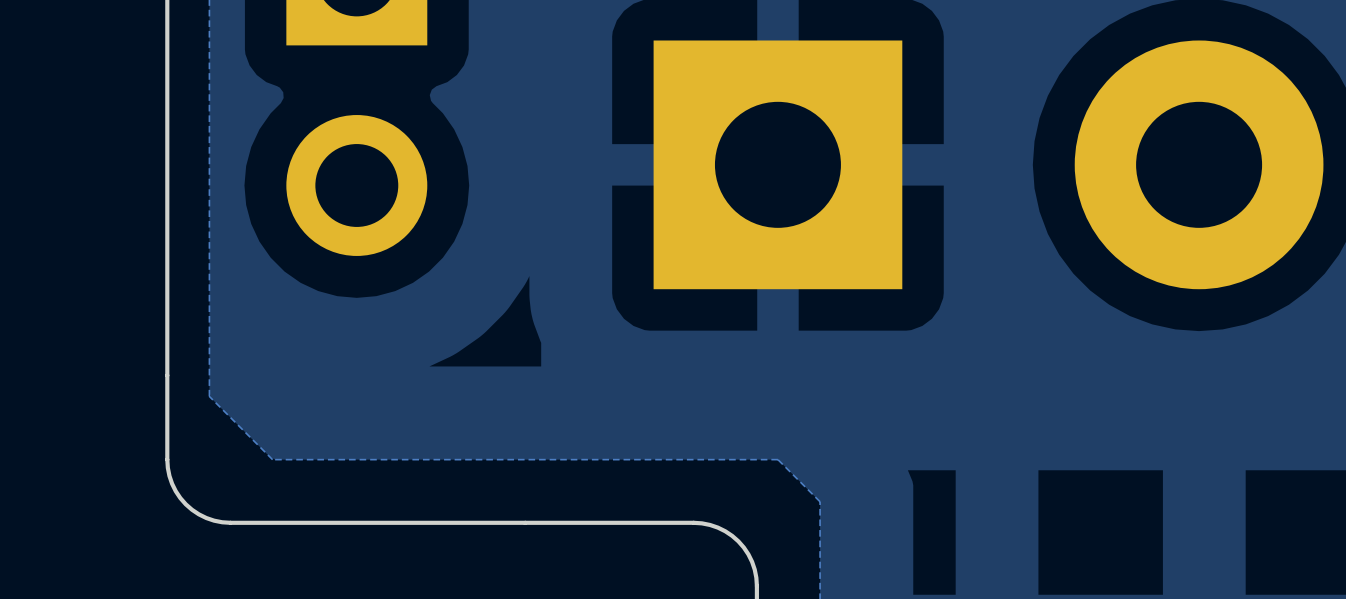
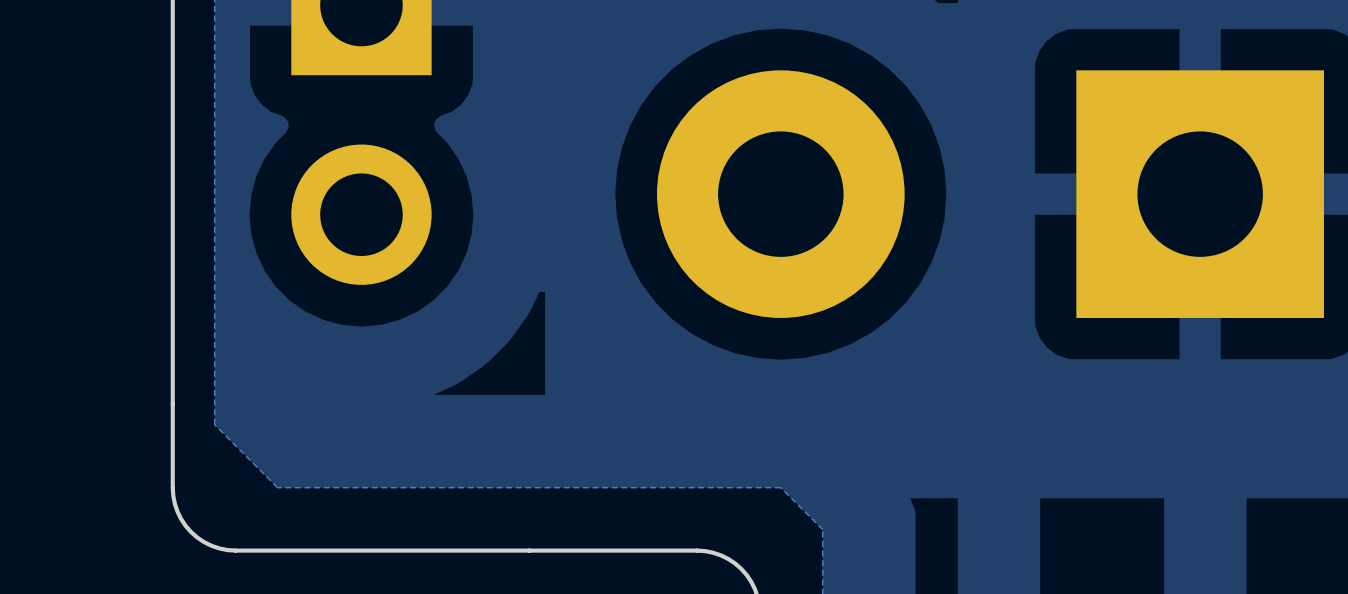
part rotation: 0° (988, 164) -> 180° (990, 194)

